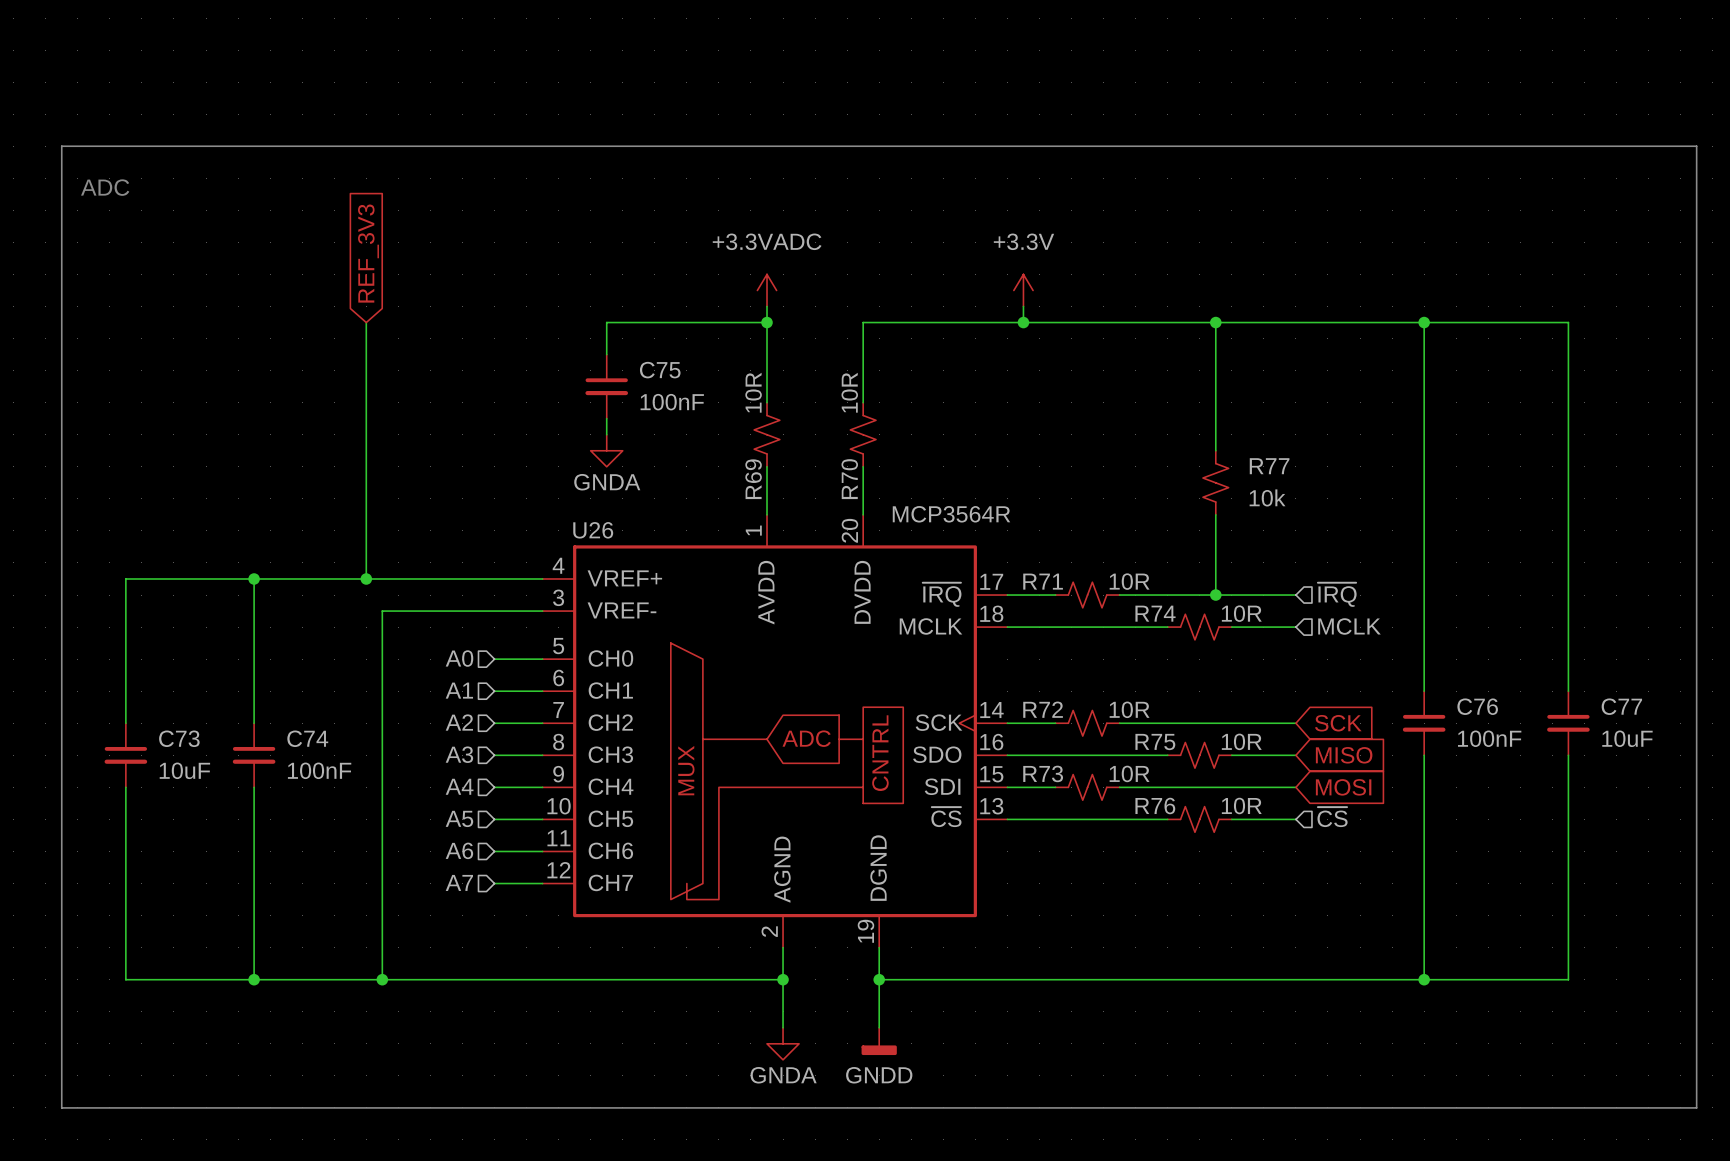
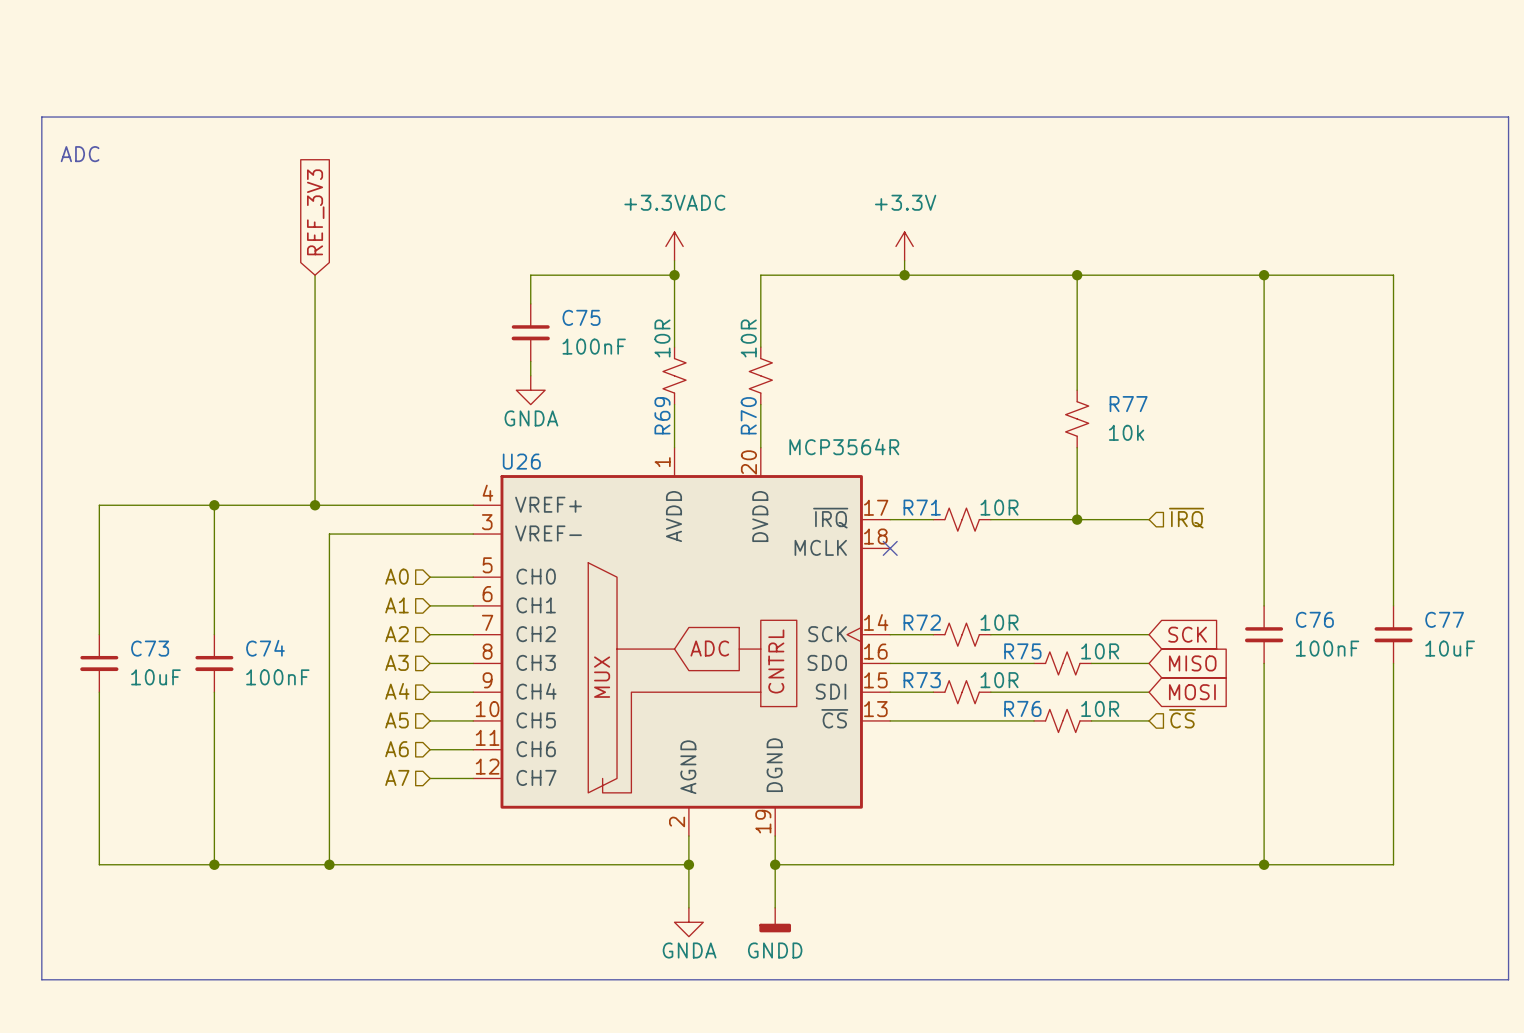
hierarchical label: MCLK (1349, 626) -> none
wire: (1007, 627) (1167, 627) -> none
no-connect mark: none -> (890, 548)
R74: 10R (1199, 627) -> none
wire: (1231, 627) (1295, 627) -> none

